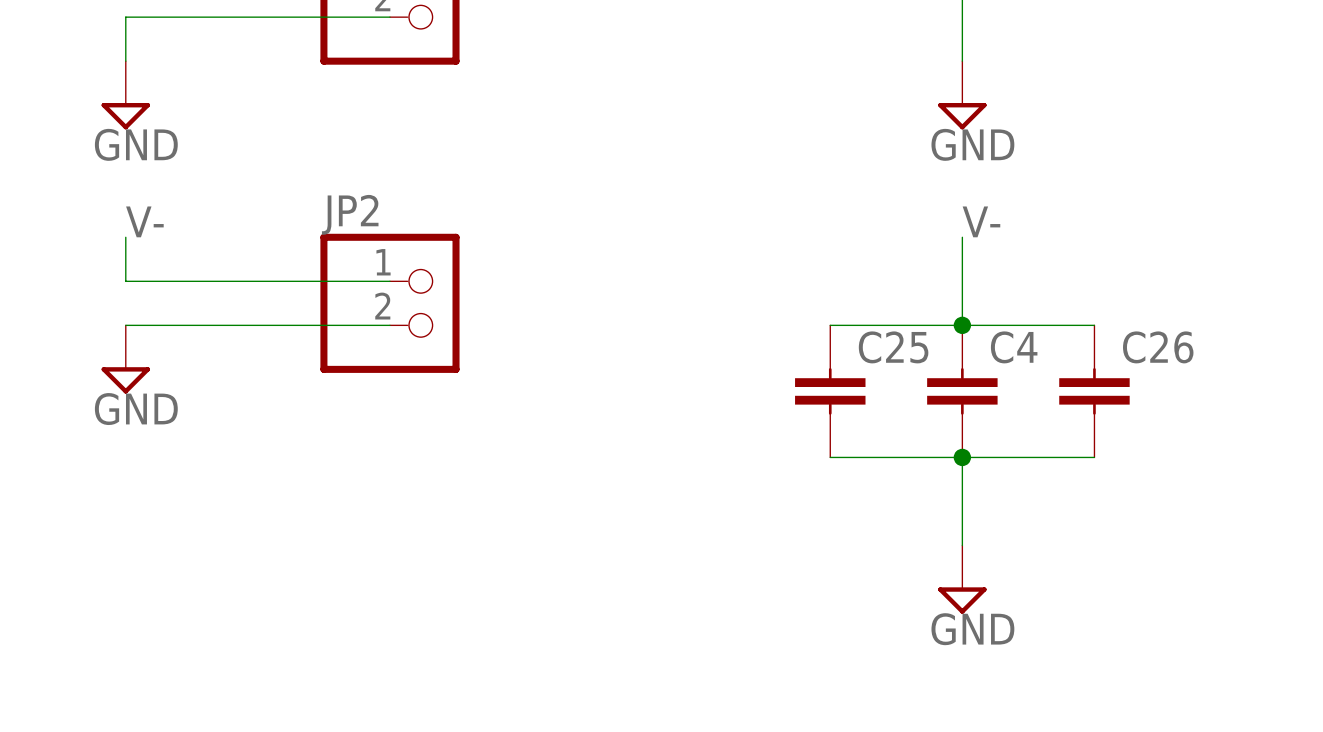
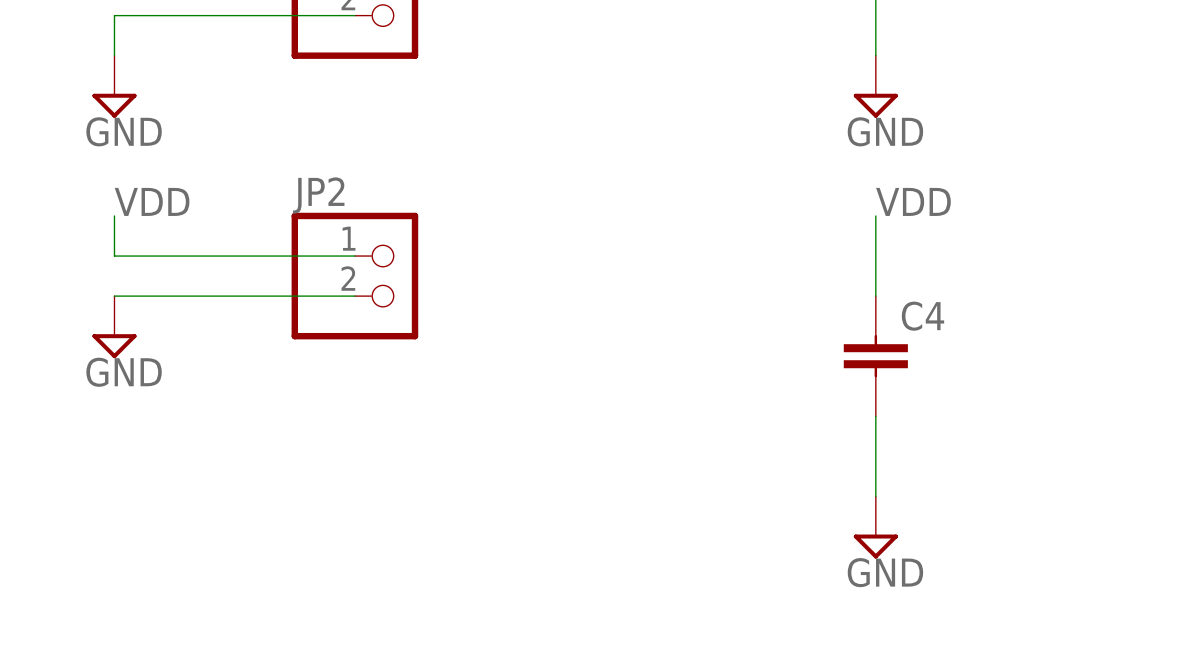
label: V- (144, 221) -> VDD (152, 201)
label: V- (981, 221) -> VDD (913, 201)
wire: (830, 325) (1094, 325) -> none
junction: (962, 325) -> none
C25: (830, 391) -> none
C26: (1094, 391) -> none
wire: (830, 457) (1094, 457) -> none
junction: (962, 457) -> none

